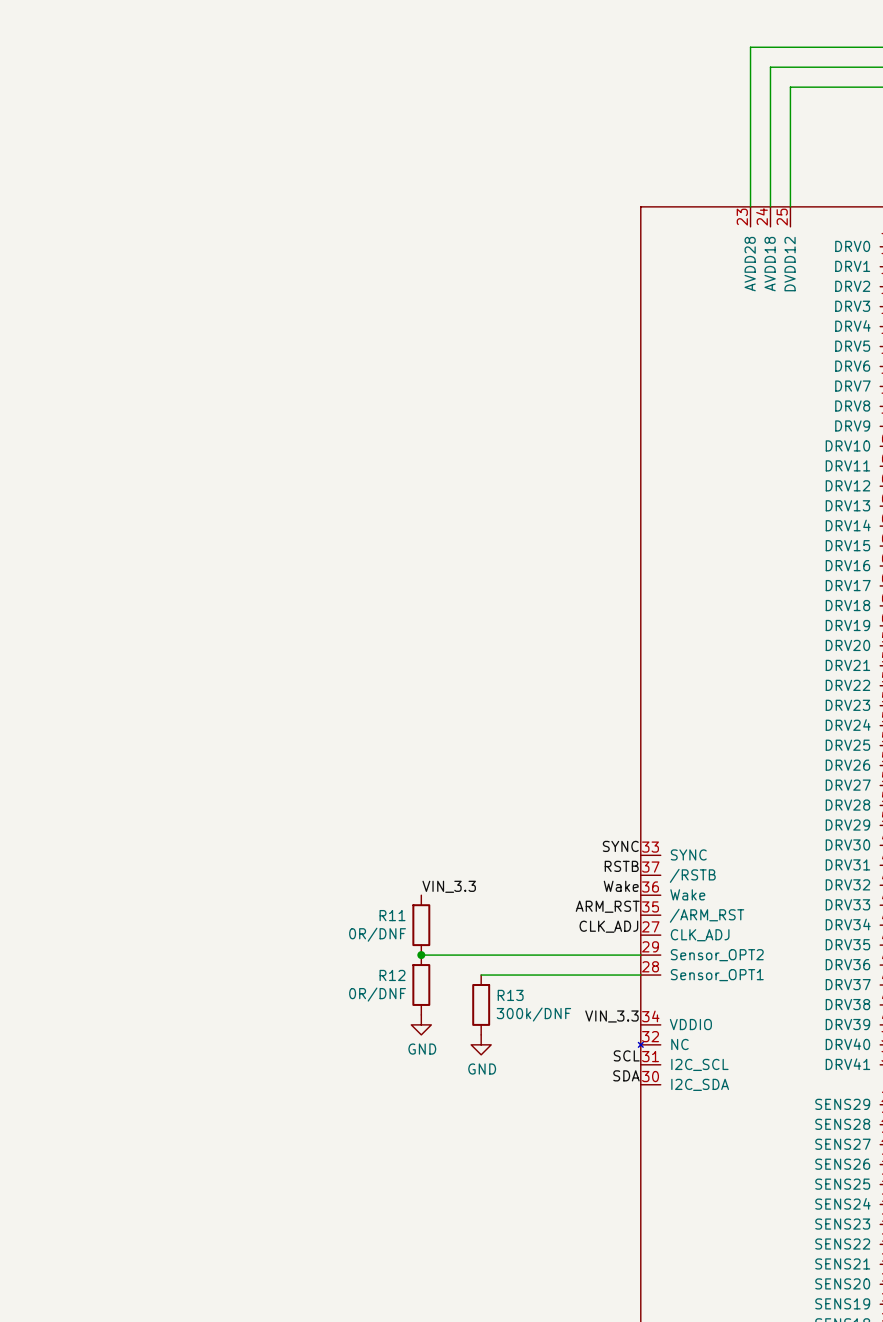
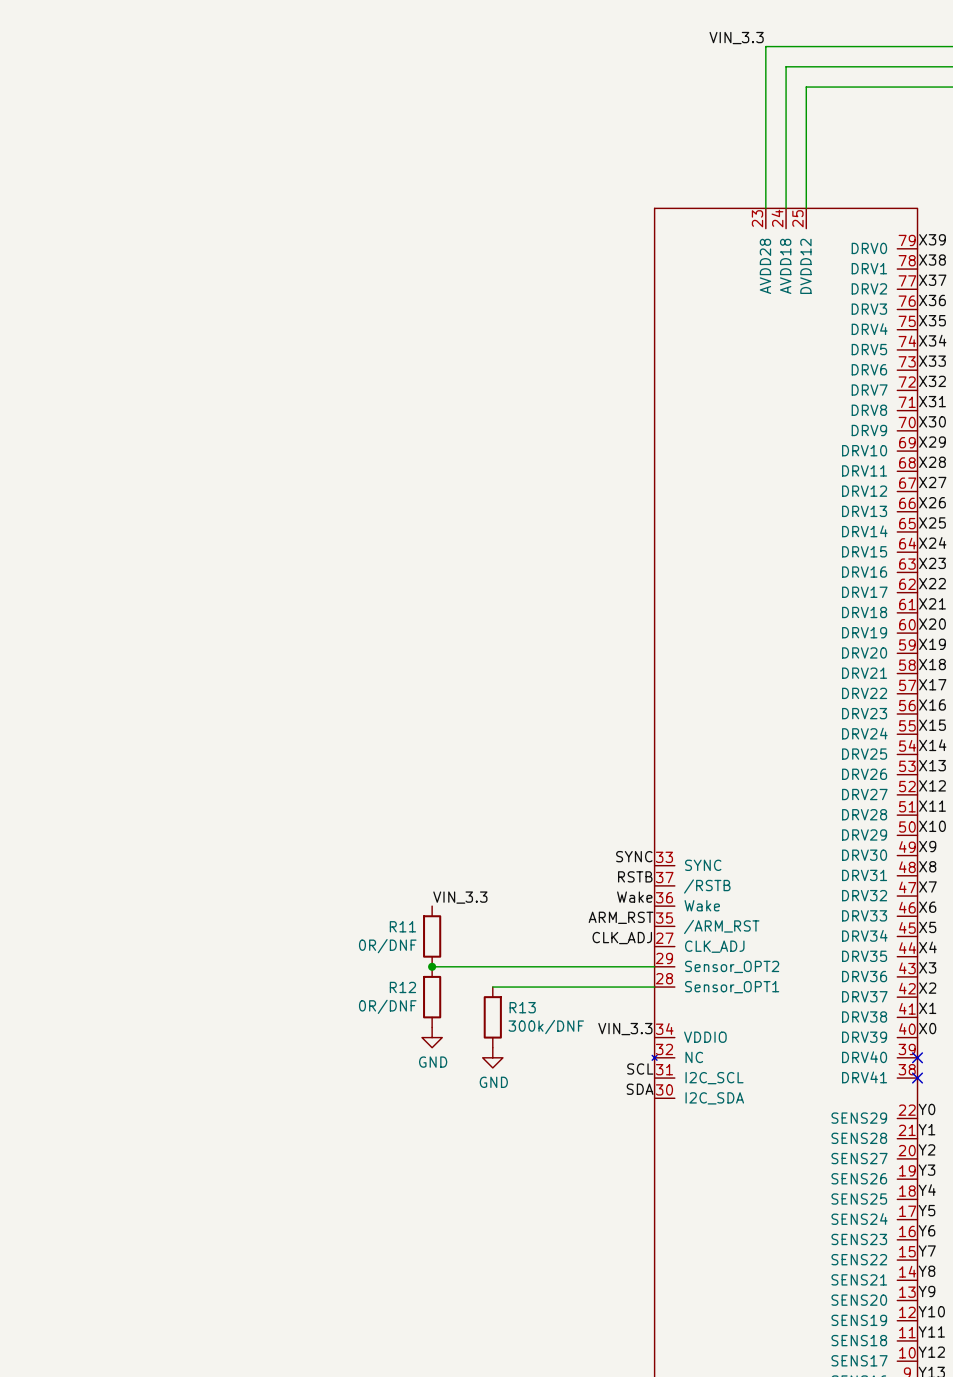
label: none -> VIN_3.3 (736, 38)

